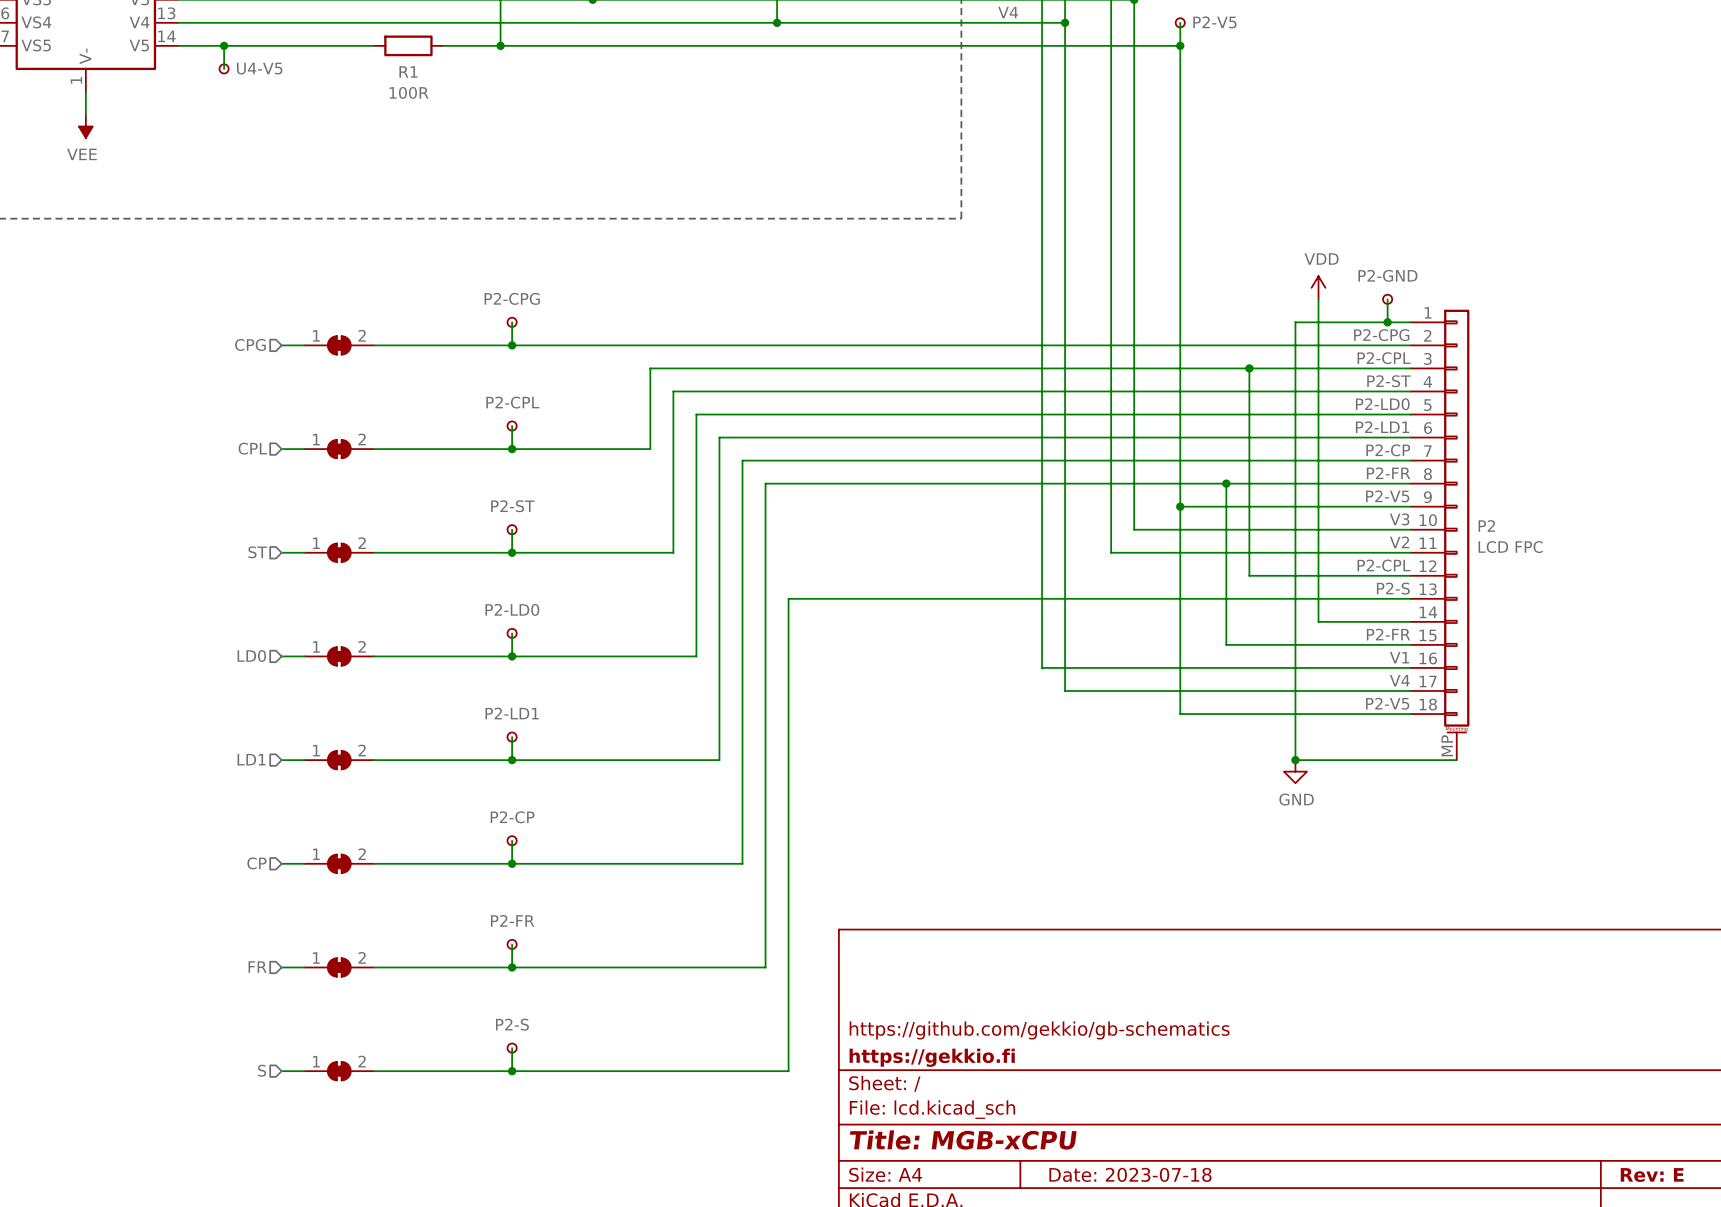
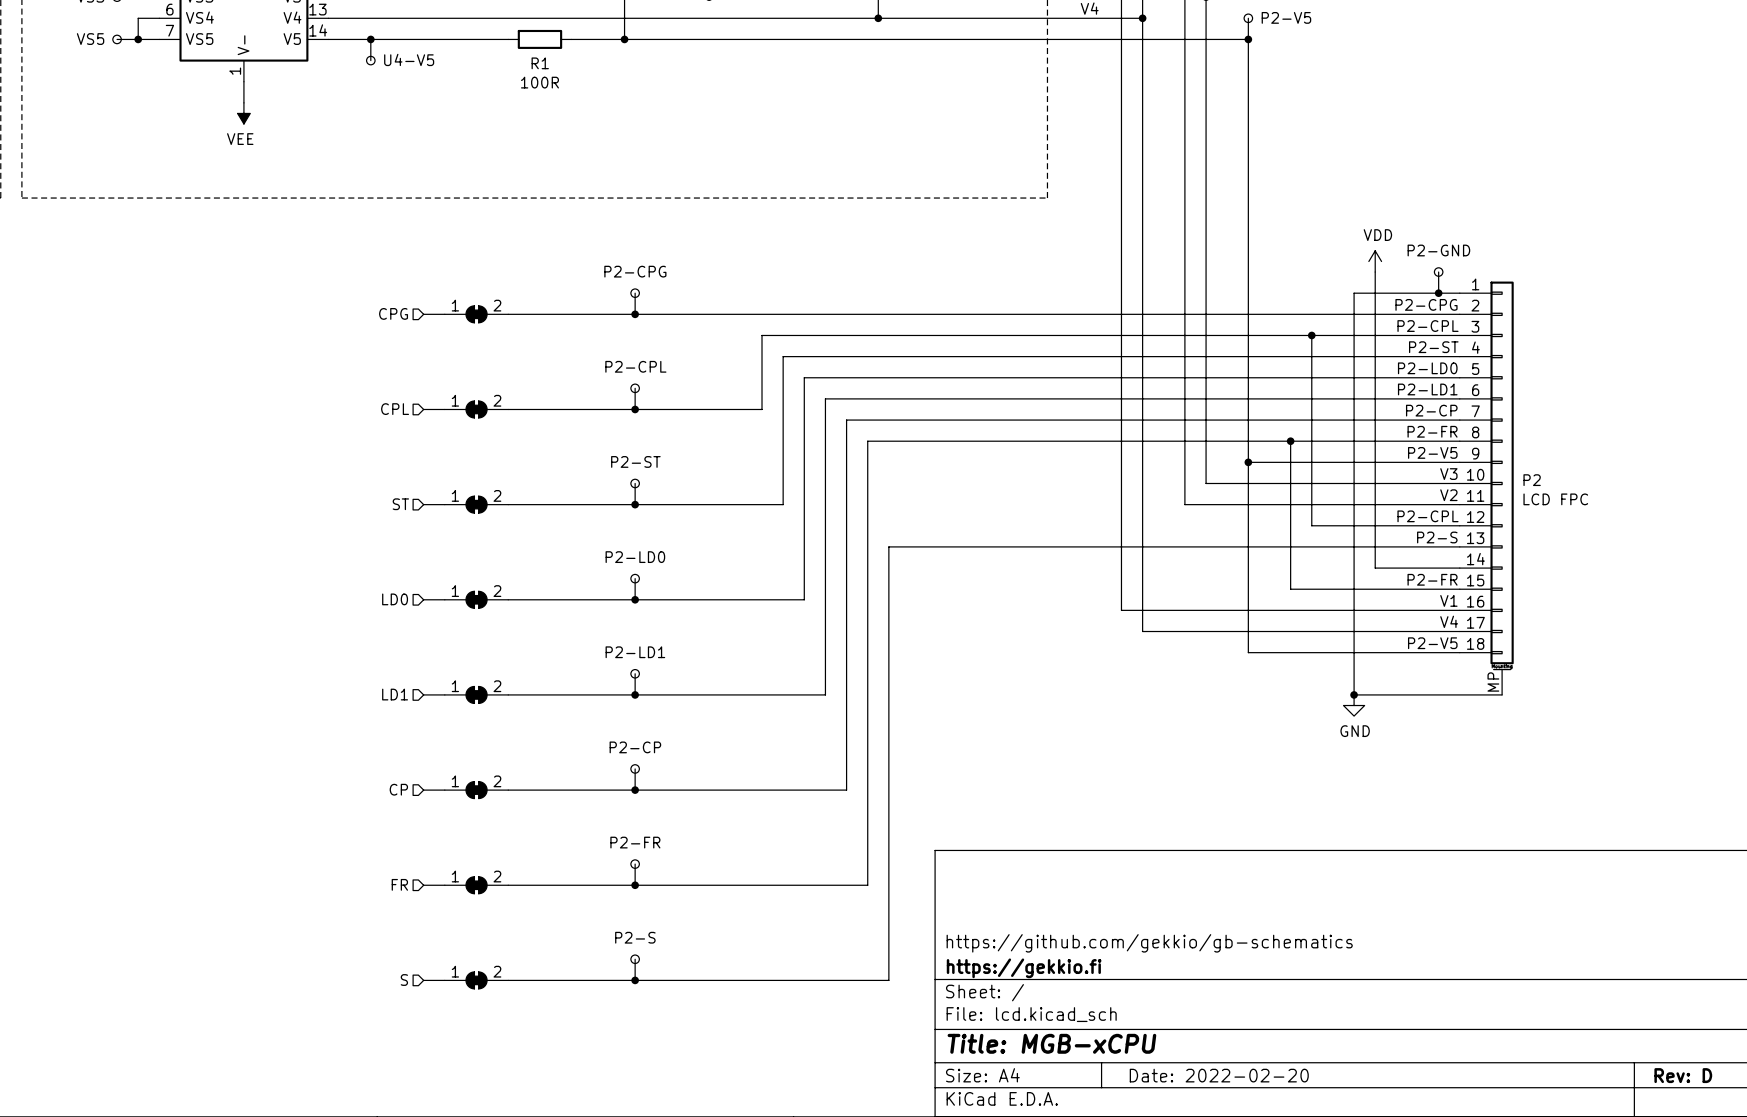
title block: Date: 2023-07-18 (1130, 1174) -> Date: 2022-02-20 (1219, 1075)
title block: Rev: E (1652, 1175) -> Rev: D (1683, 1075)

